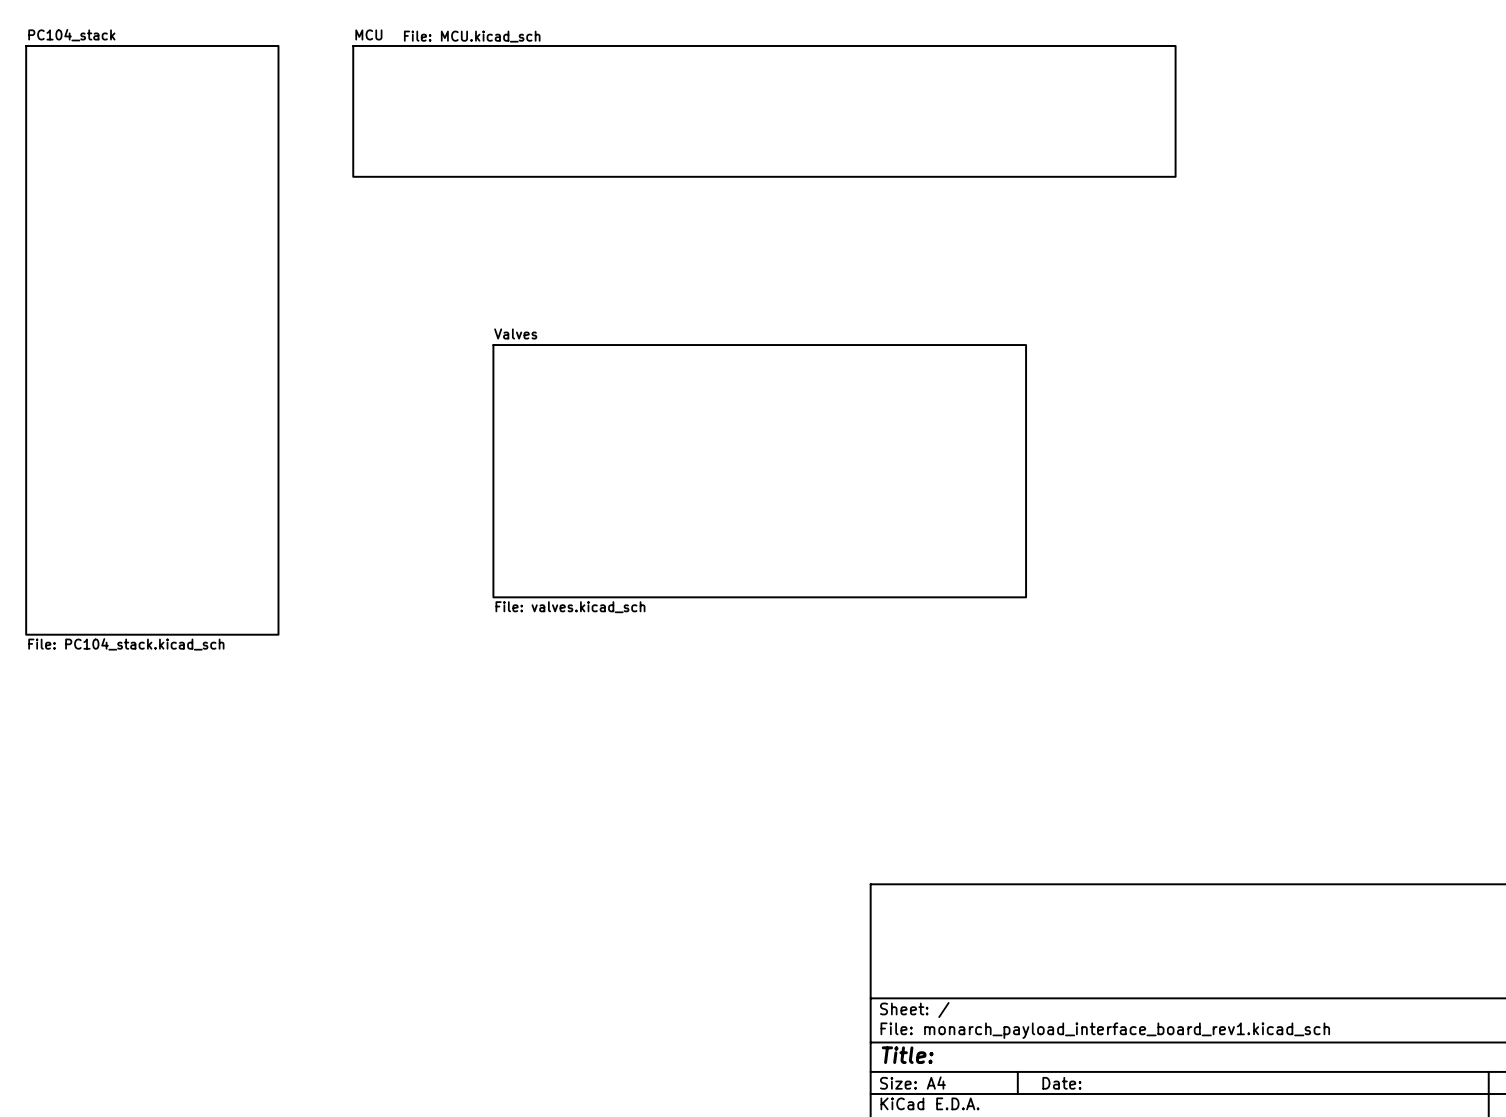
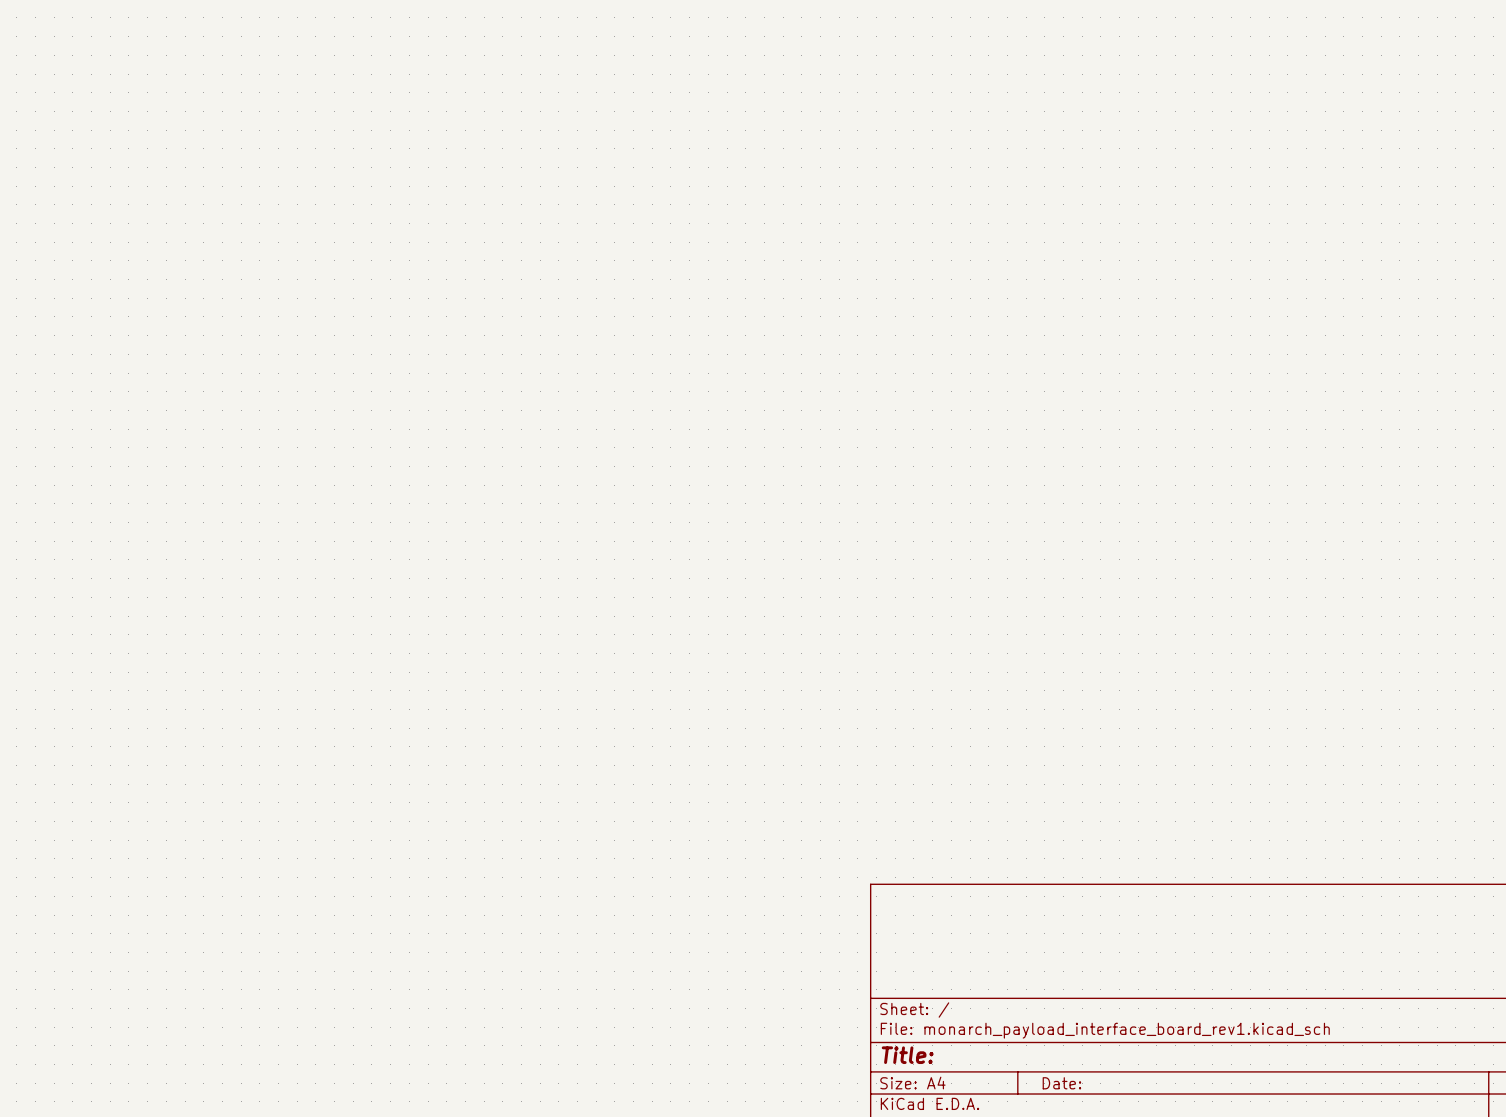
sheet MCU: File: MCU.kicad_sch (764, 111) -> none
sheet PC104_stack: File: PC104_stack.kicad_sch (152, 340) -> none
sheet Valves: File: valves.kicad_sch (759, 471) -> none

